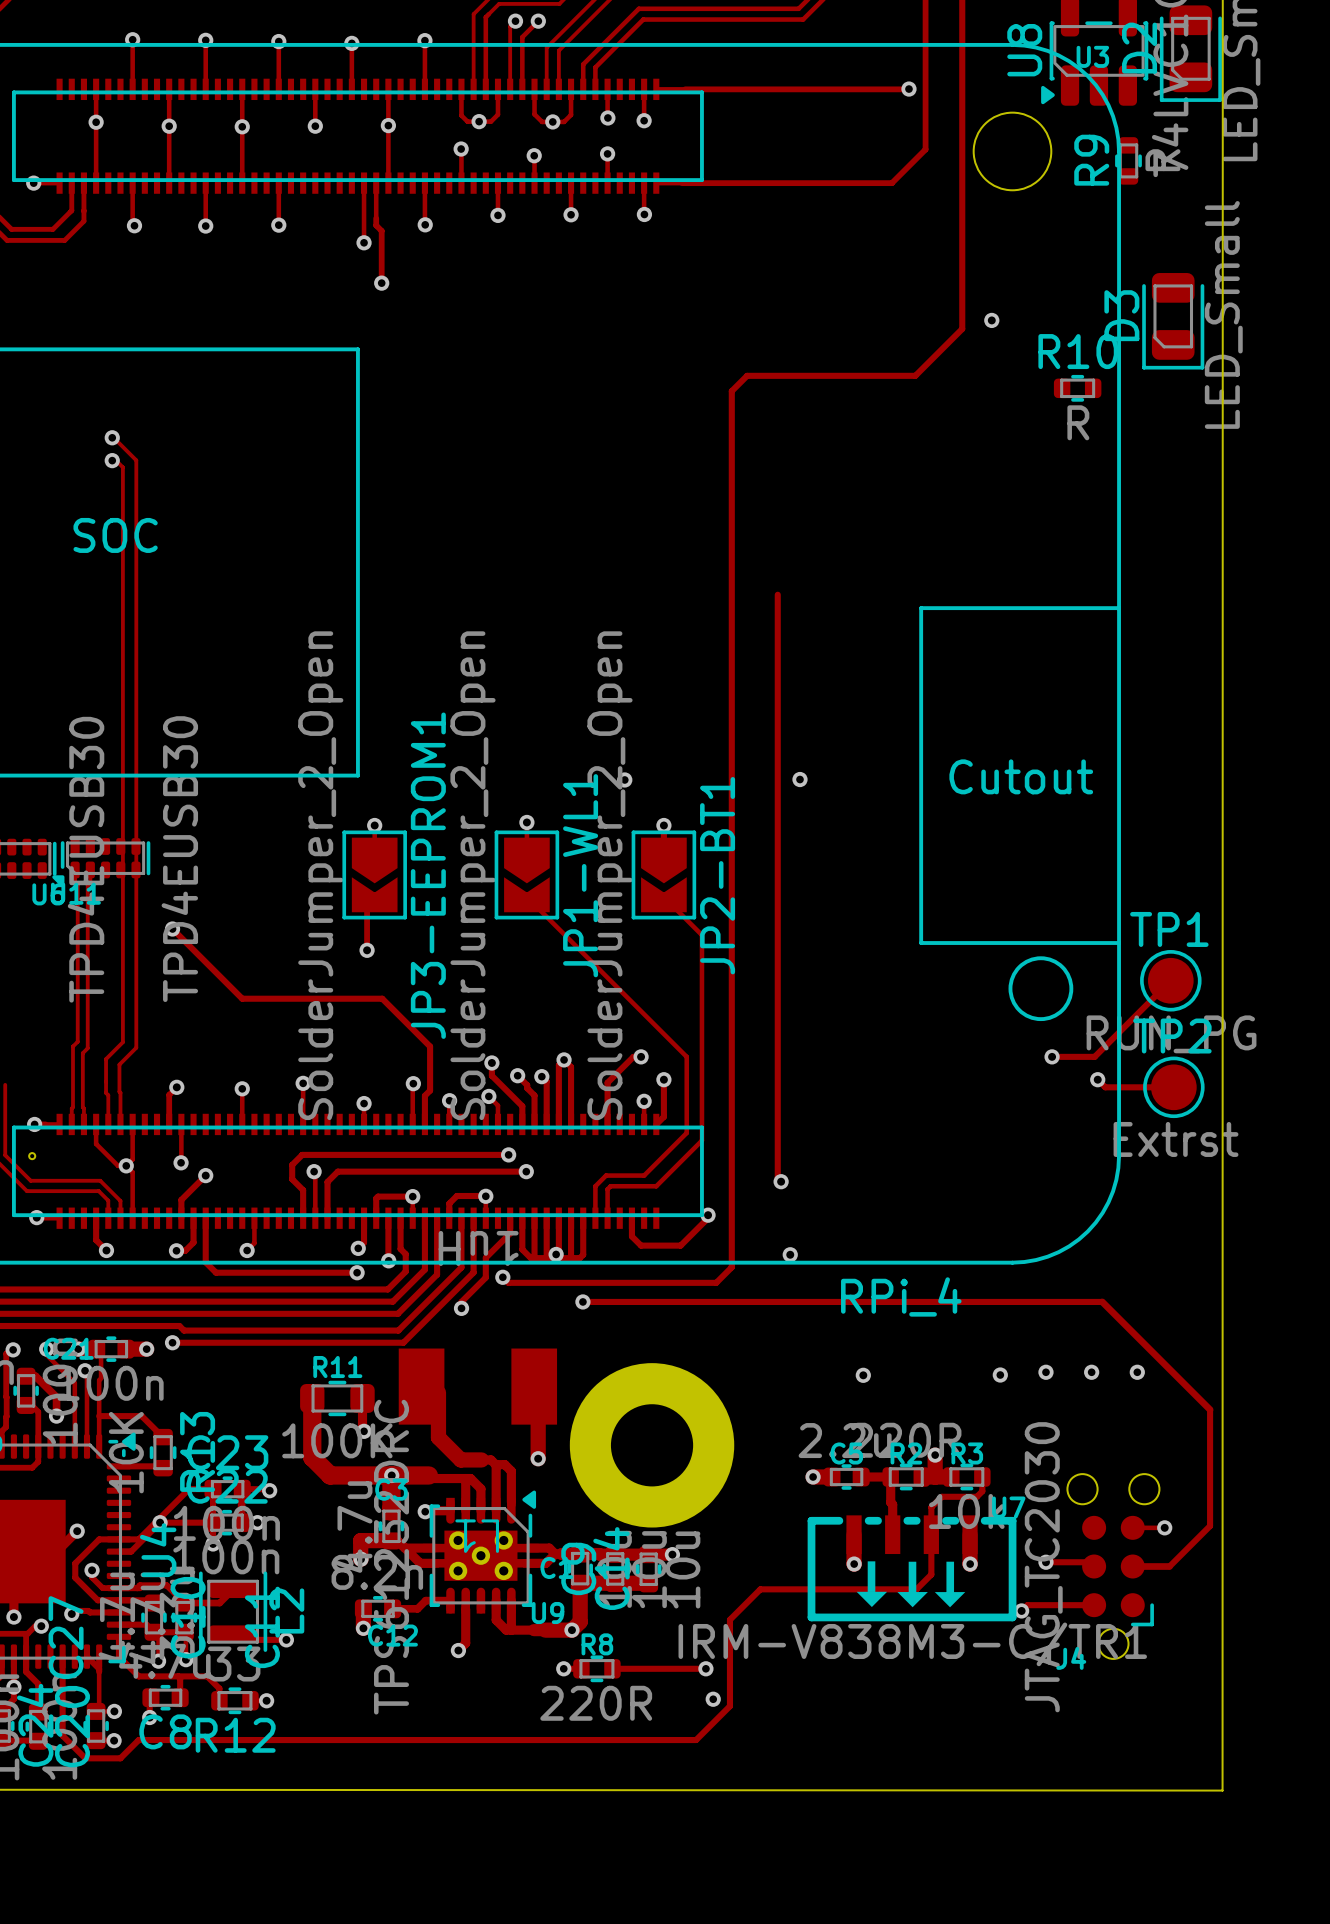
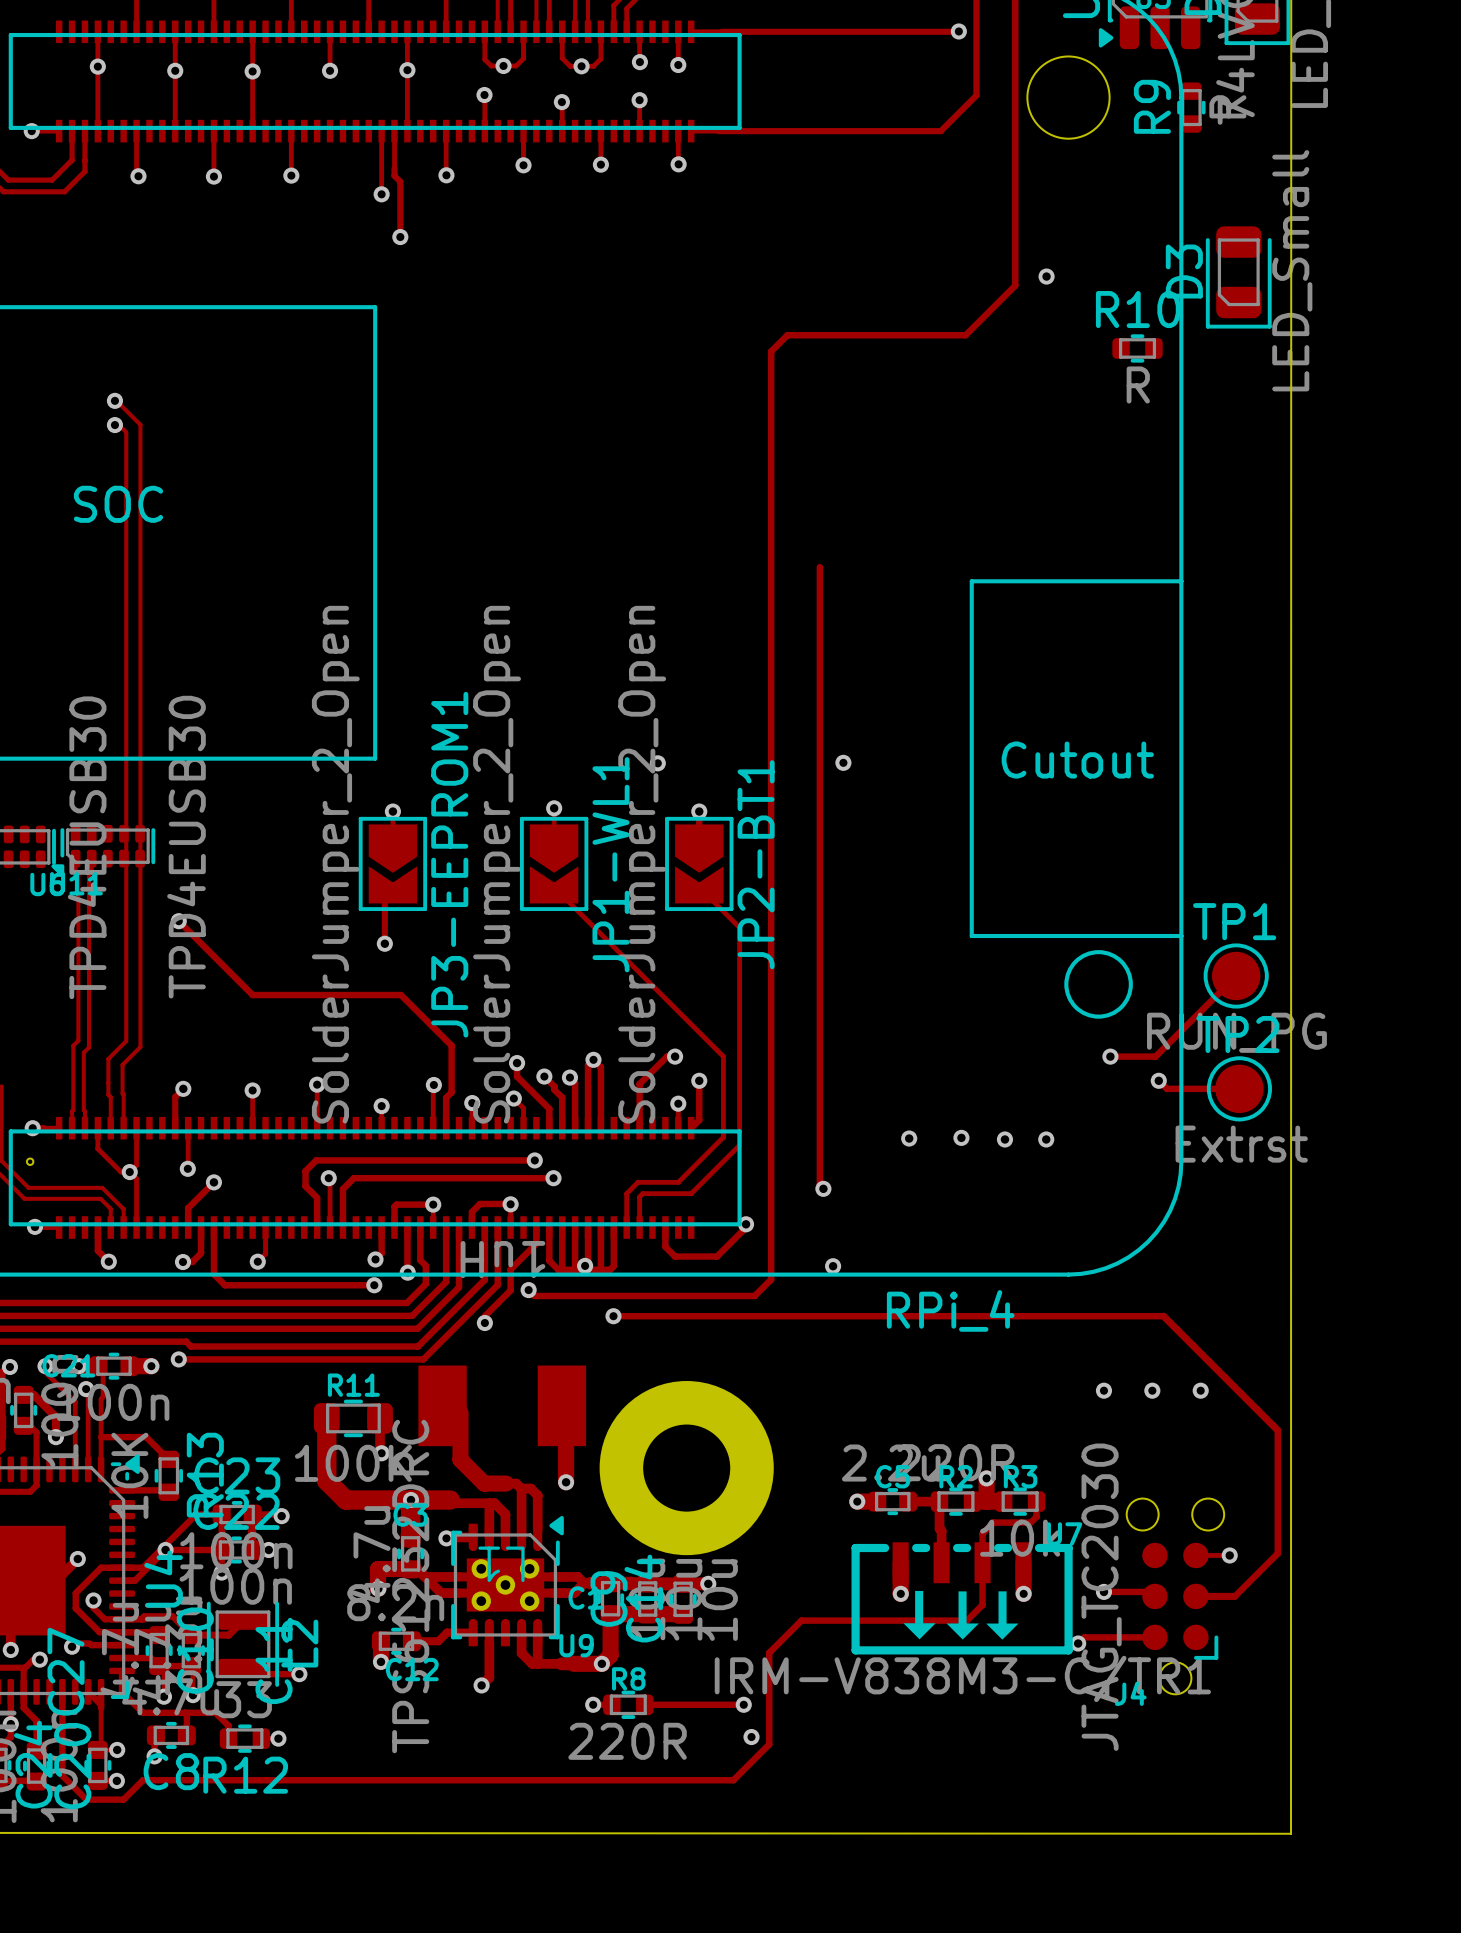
via: none -> (961, 1137)
via: none -> (909, 1138)
via: none -> (1004, 1139)
via: none -> (1046, 1139)
via: (863, 1375) -> none
via: (1000, 1375) -> none

